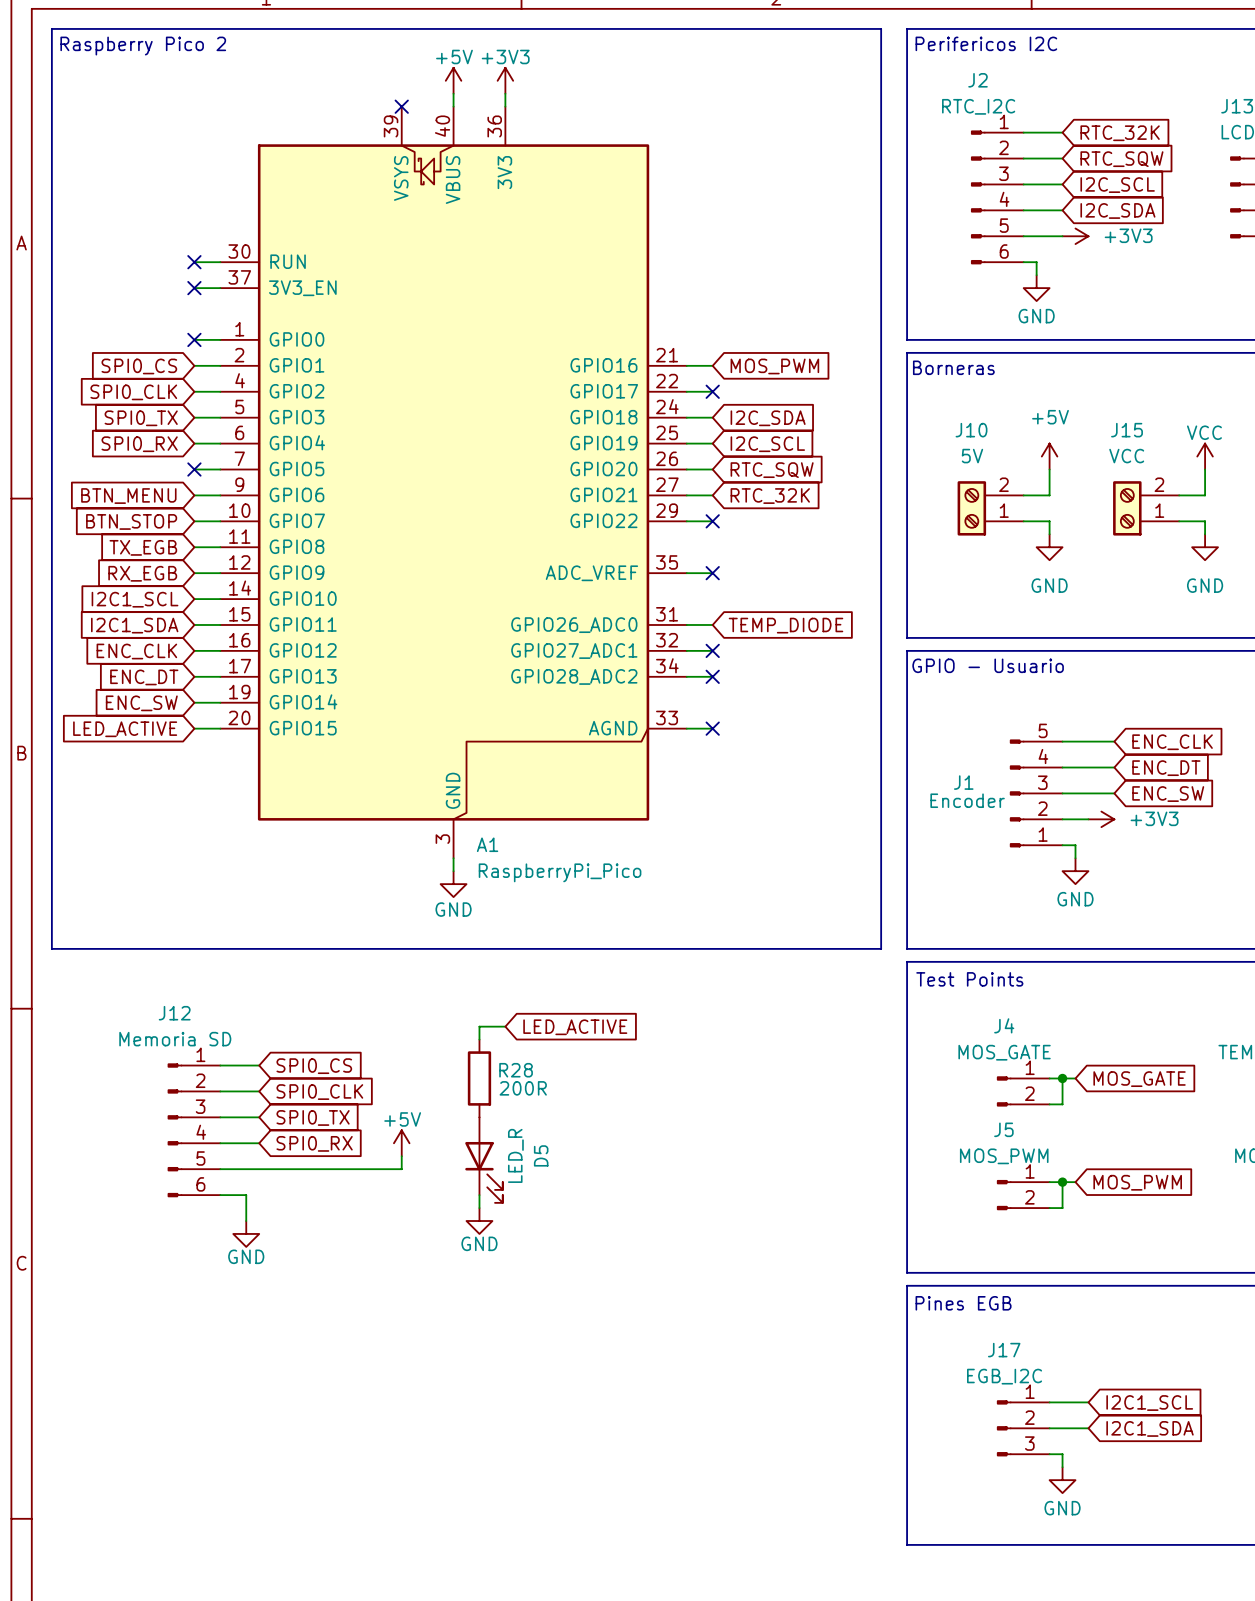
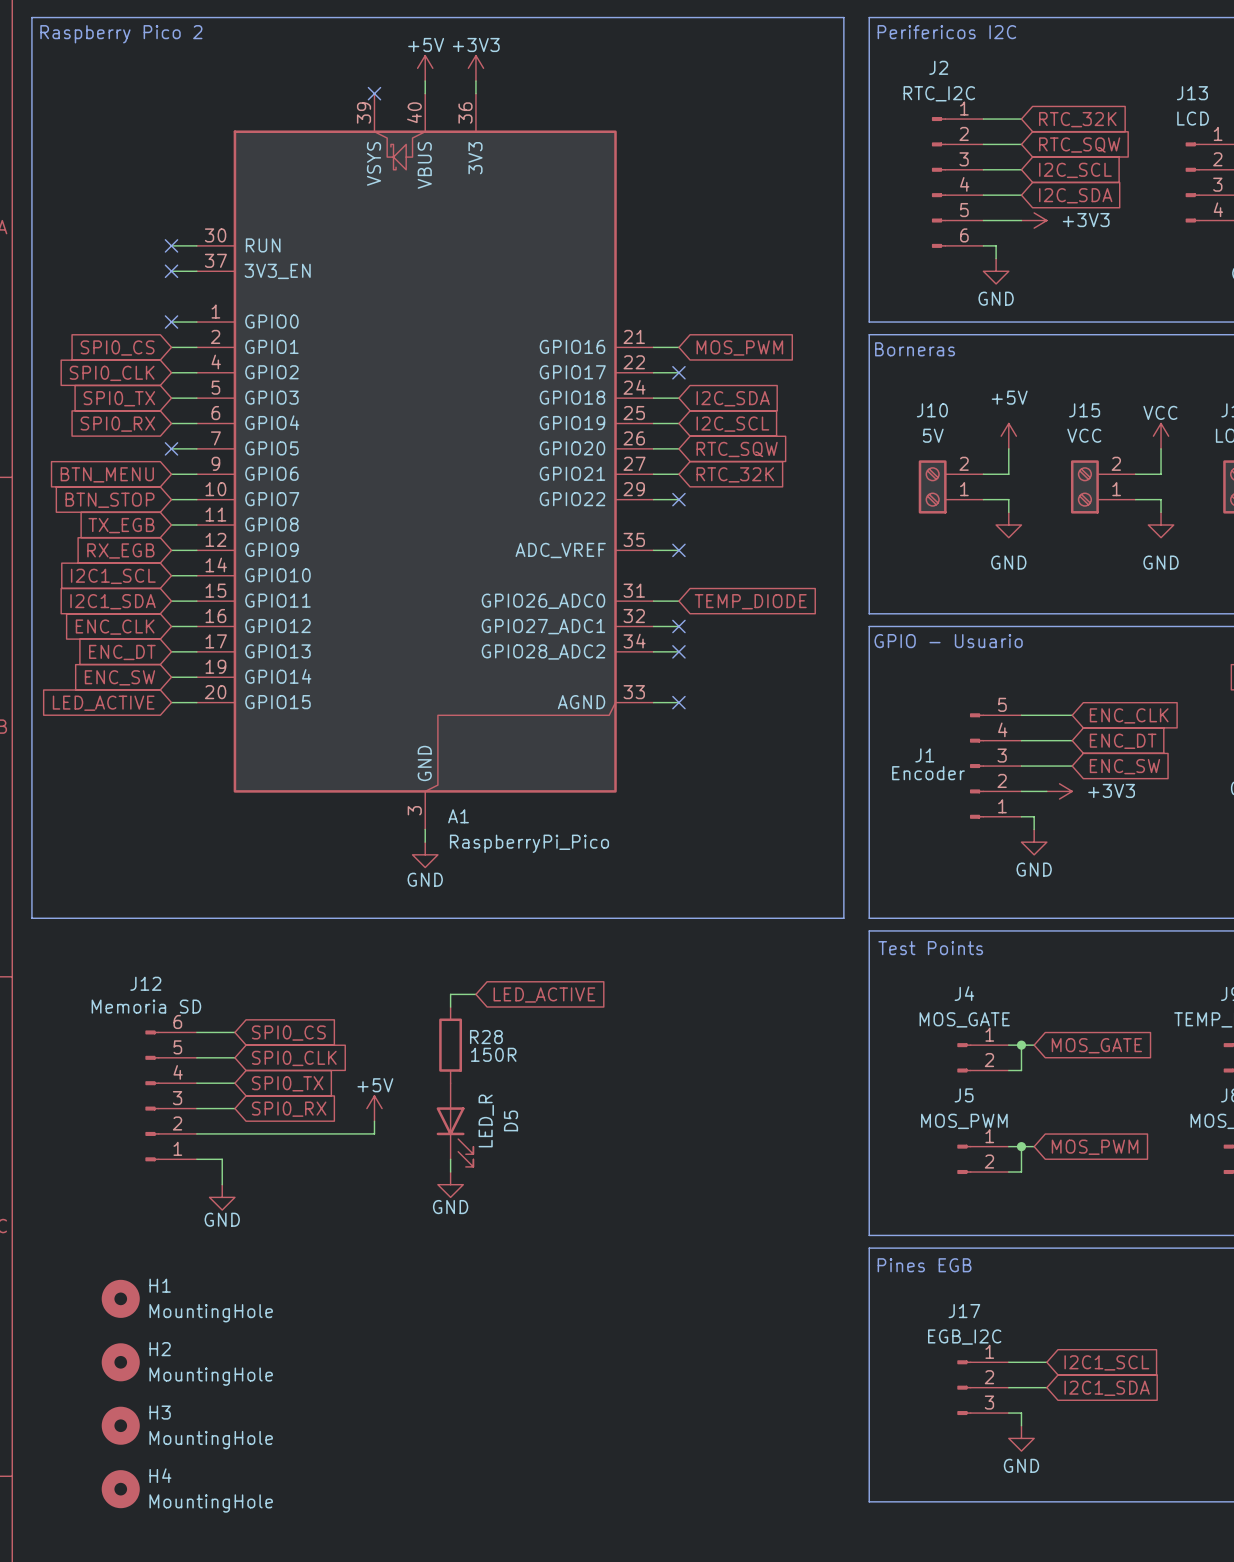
R28 value: 200R (523, 1088) -> 150R (493, 1054)
J12 flip: as is (174, 1130) -> up-down (152, 1095)
H1: none -> MountingHole (120, 1298)
H2: none -> MountingHole (120, 1362)
H3: none -> MountingHole (120, 1425)
H4: none -> MountingHole (120, 1489)

